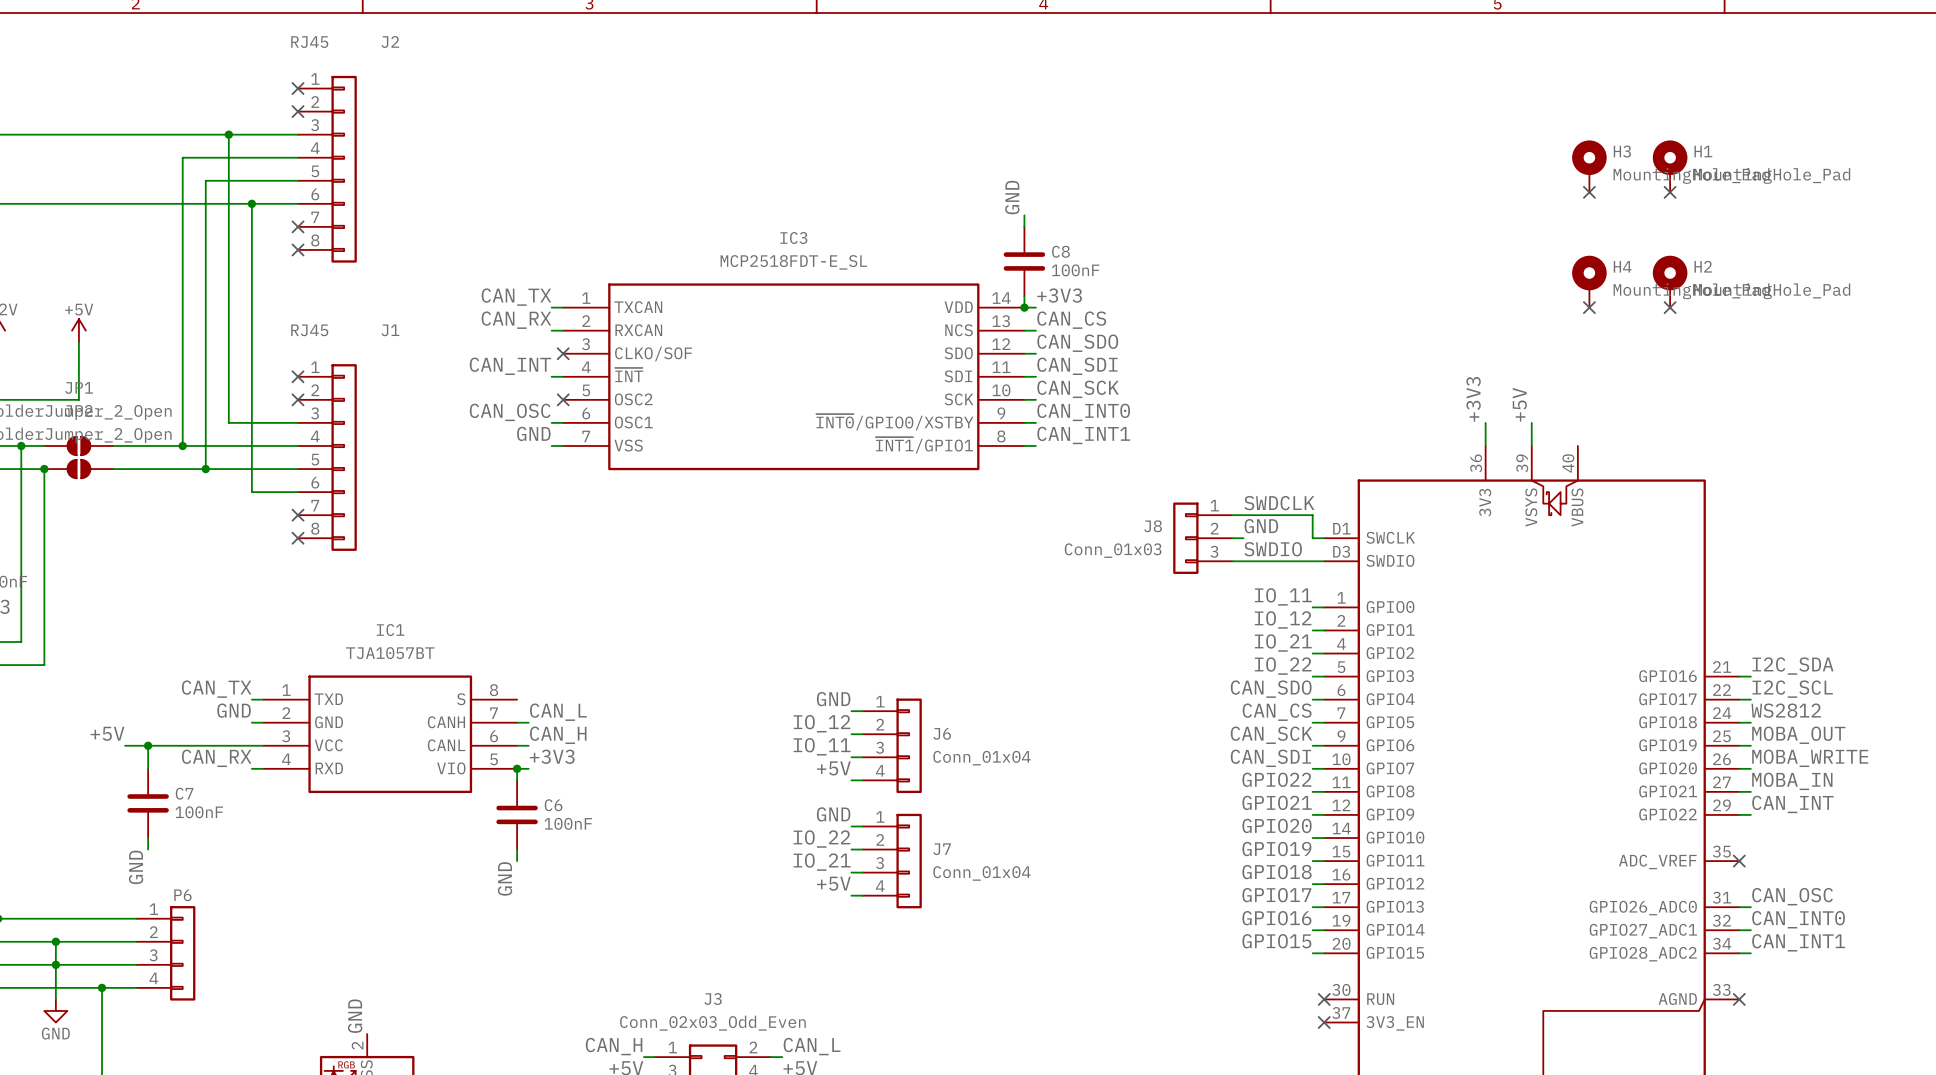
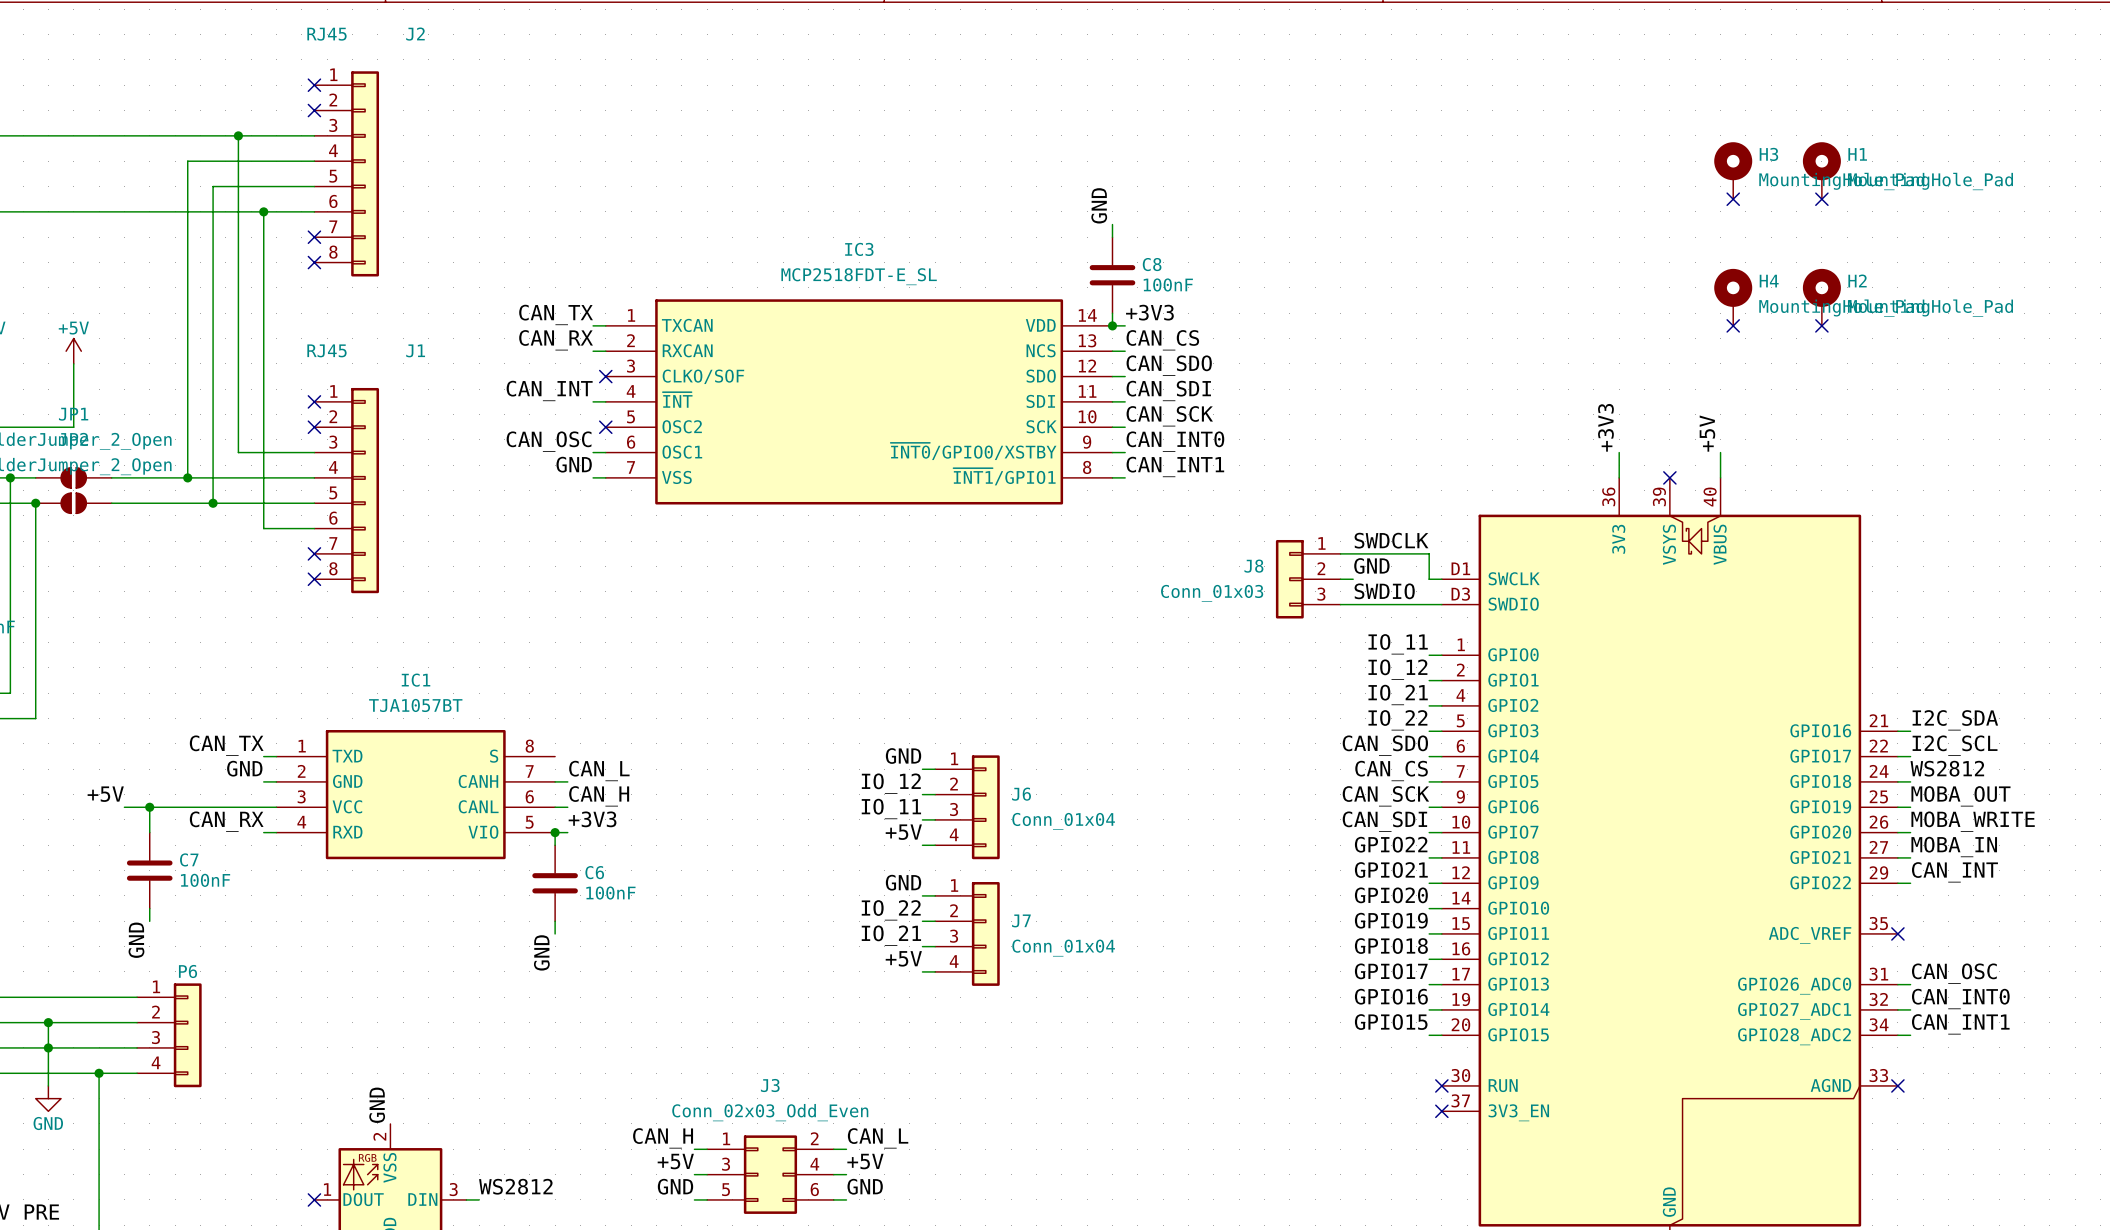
label position: +5V (1519, 404) -> +5V (1707, 433)
wire: (1531, 422) (1531, 445) -> (1720, 452) (1720, 477)
no-connect mark: none -> (1669, 477)

